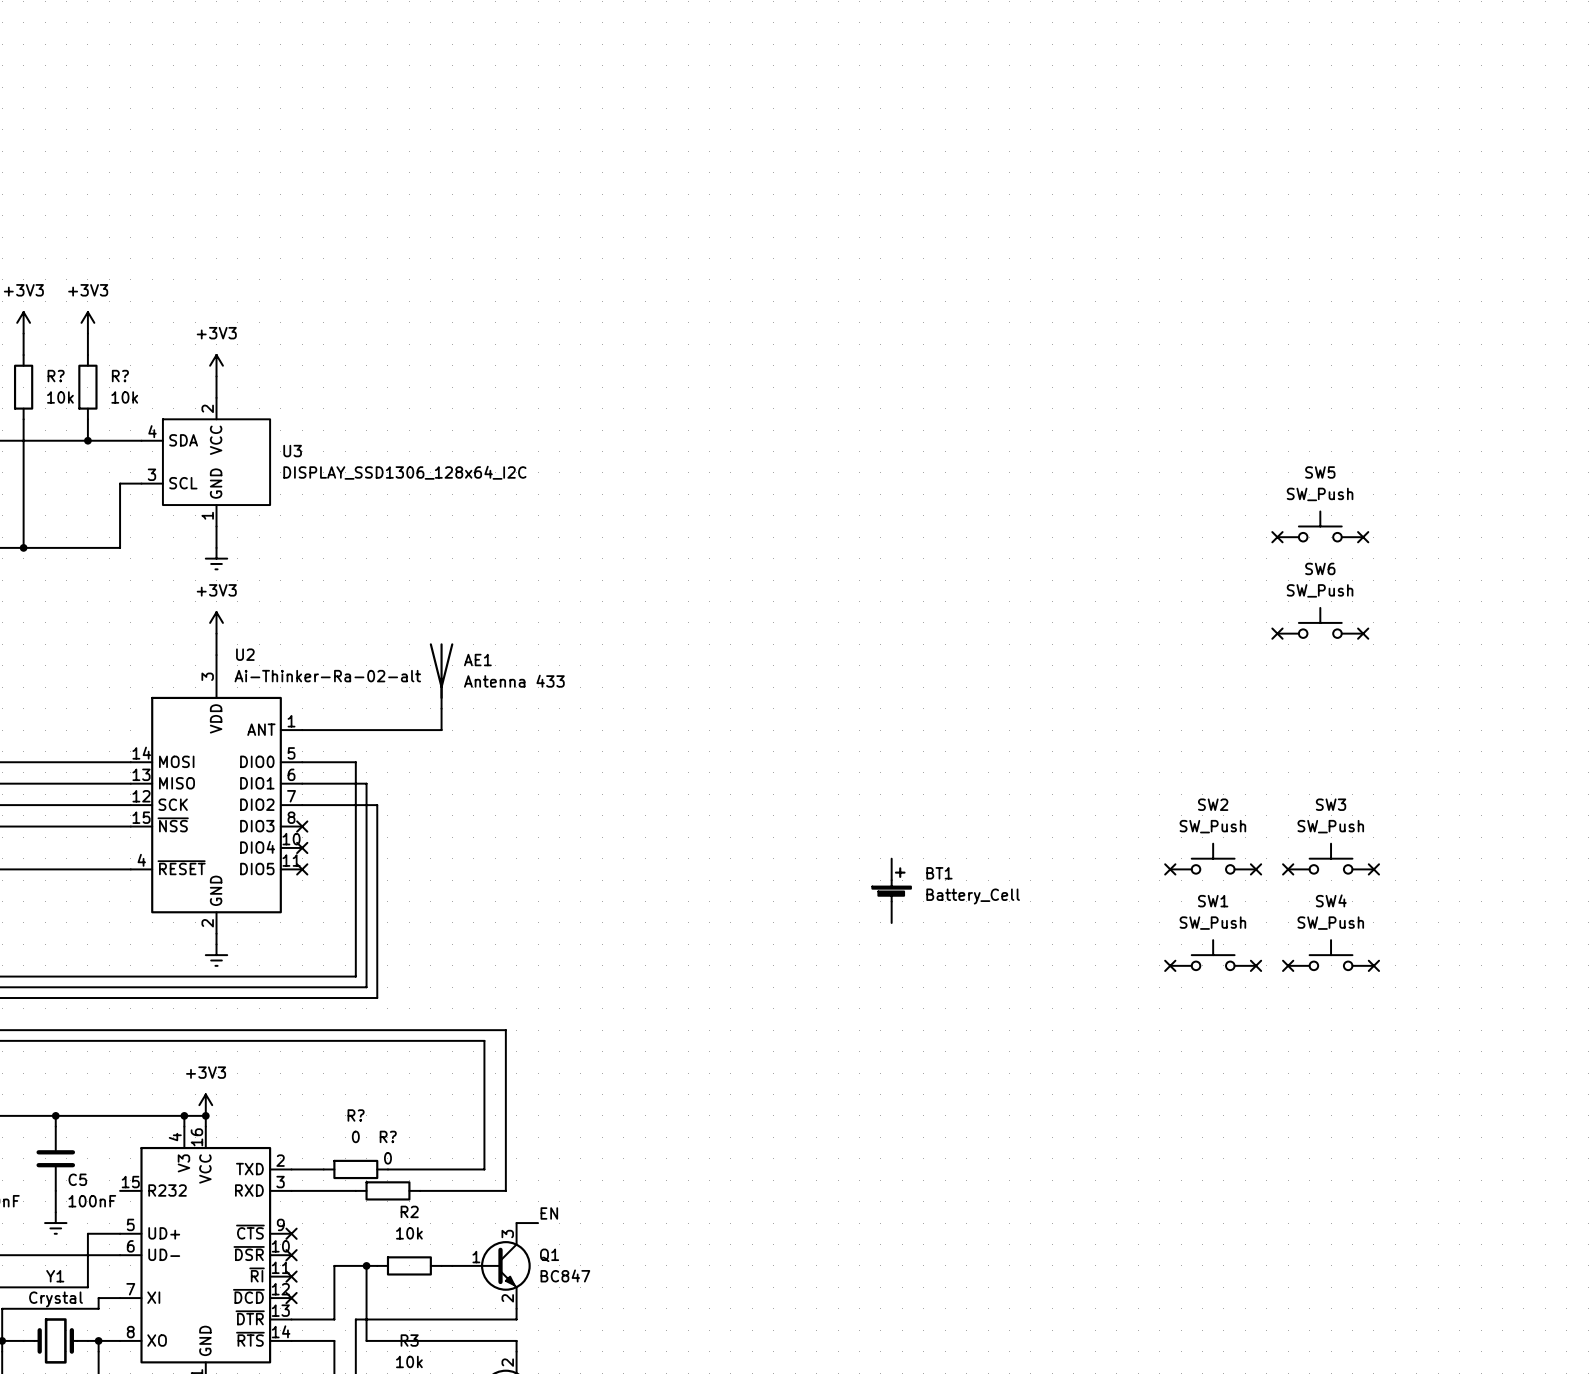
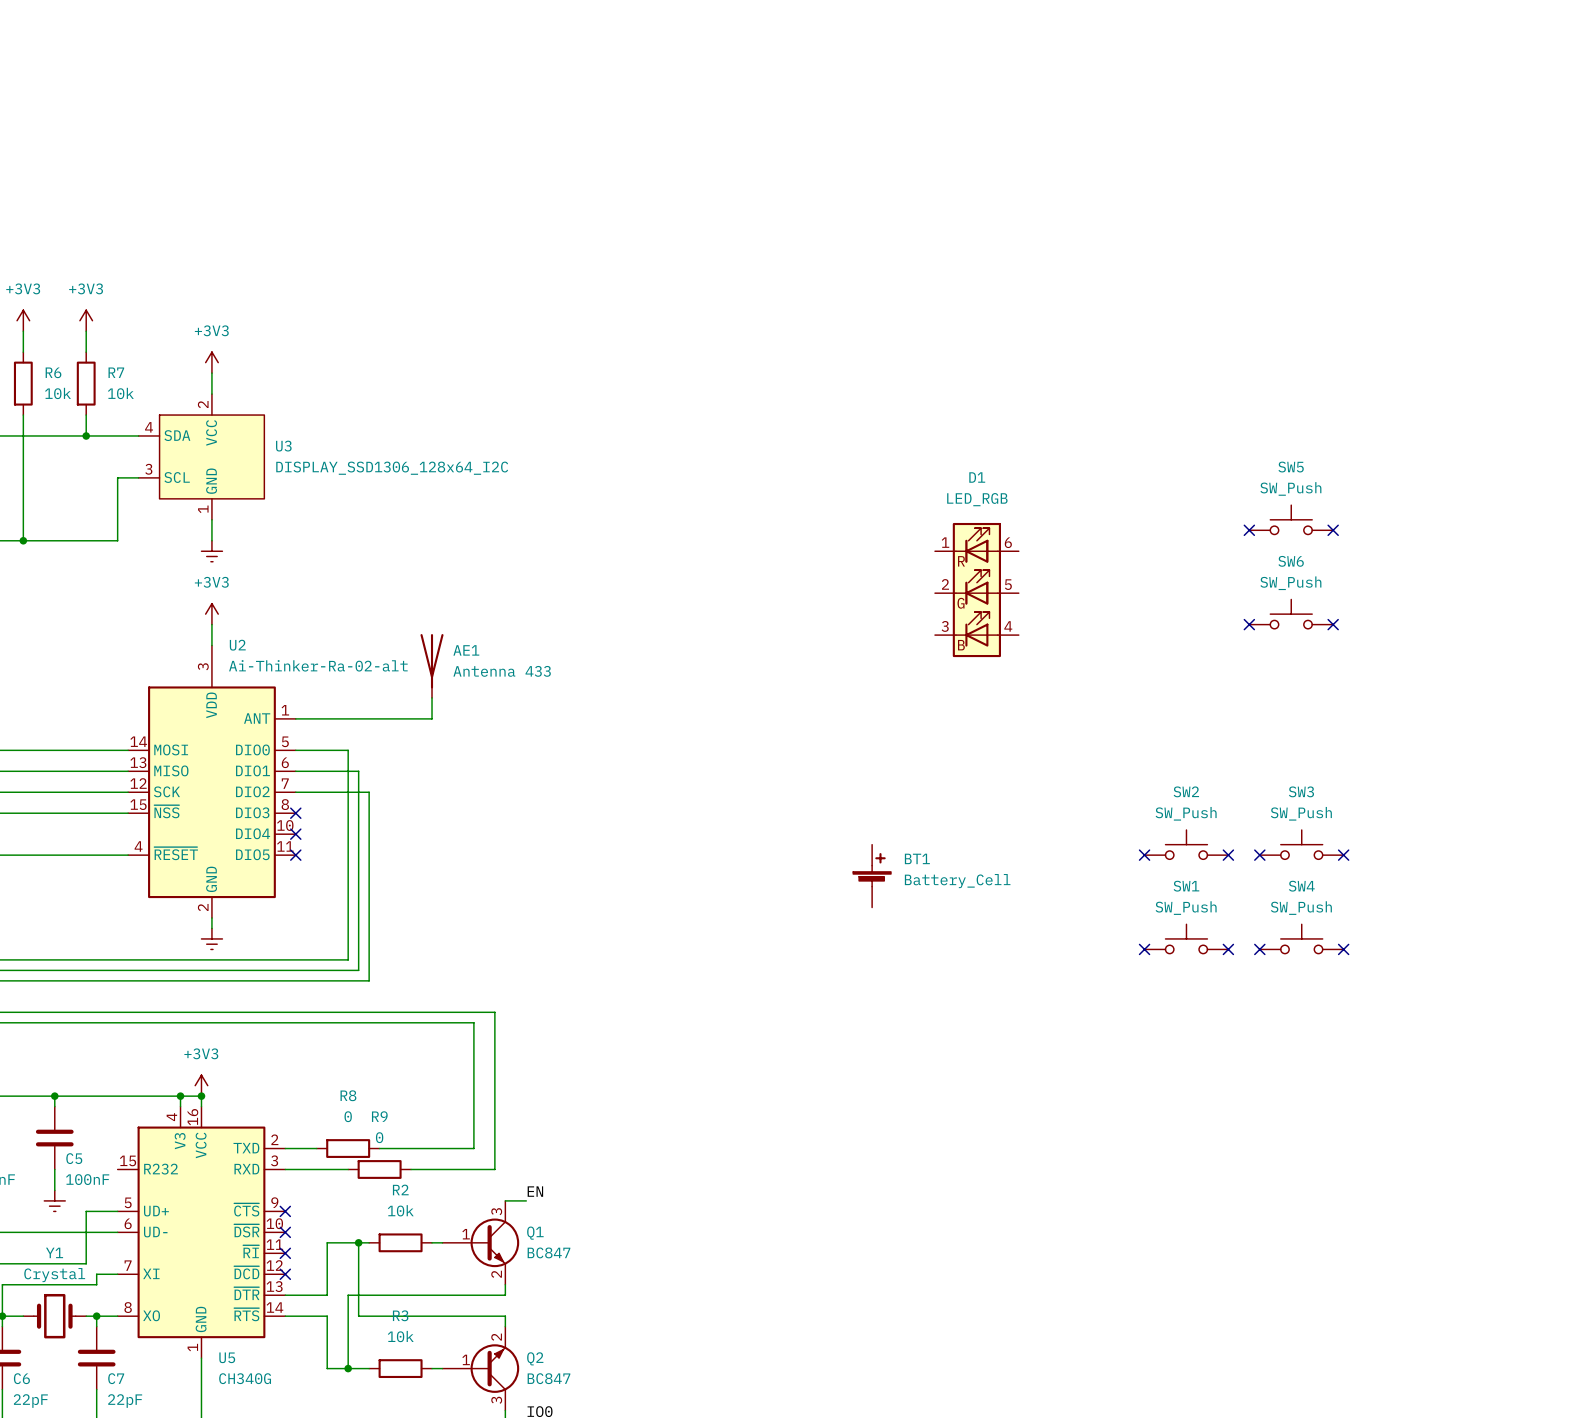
R? name: R? (56, 376) -> R6 (53, 372)
R? name: R? (120, 376) -> R7 (116, 372)
D1: none -> LED_RGB (976, 590)
R? name: R? (356, 1115) -> R8 (348, 1095)
R? name: R? (388, 1136) -> R9 (379, 1116)

